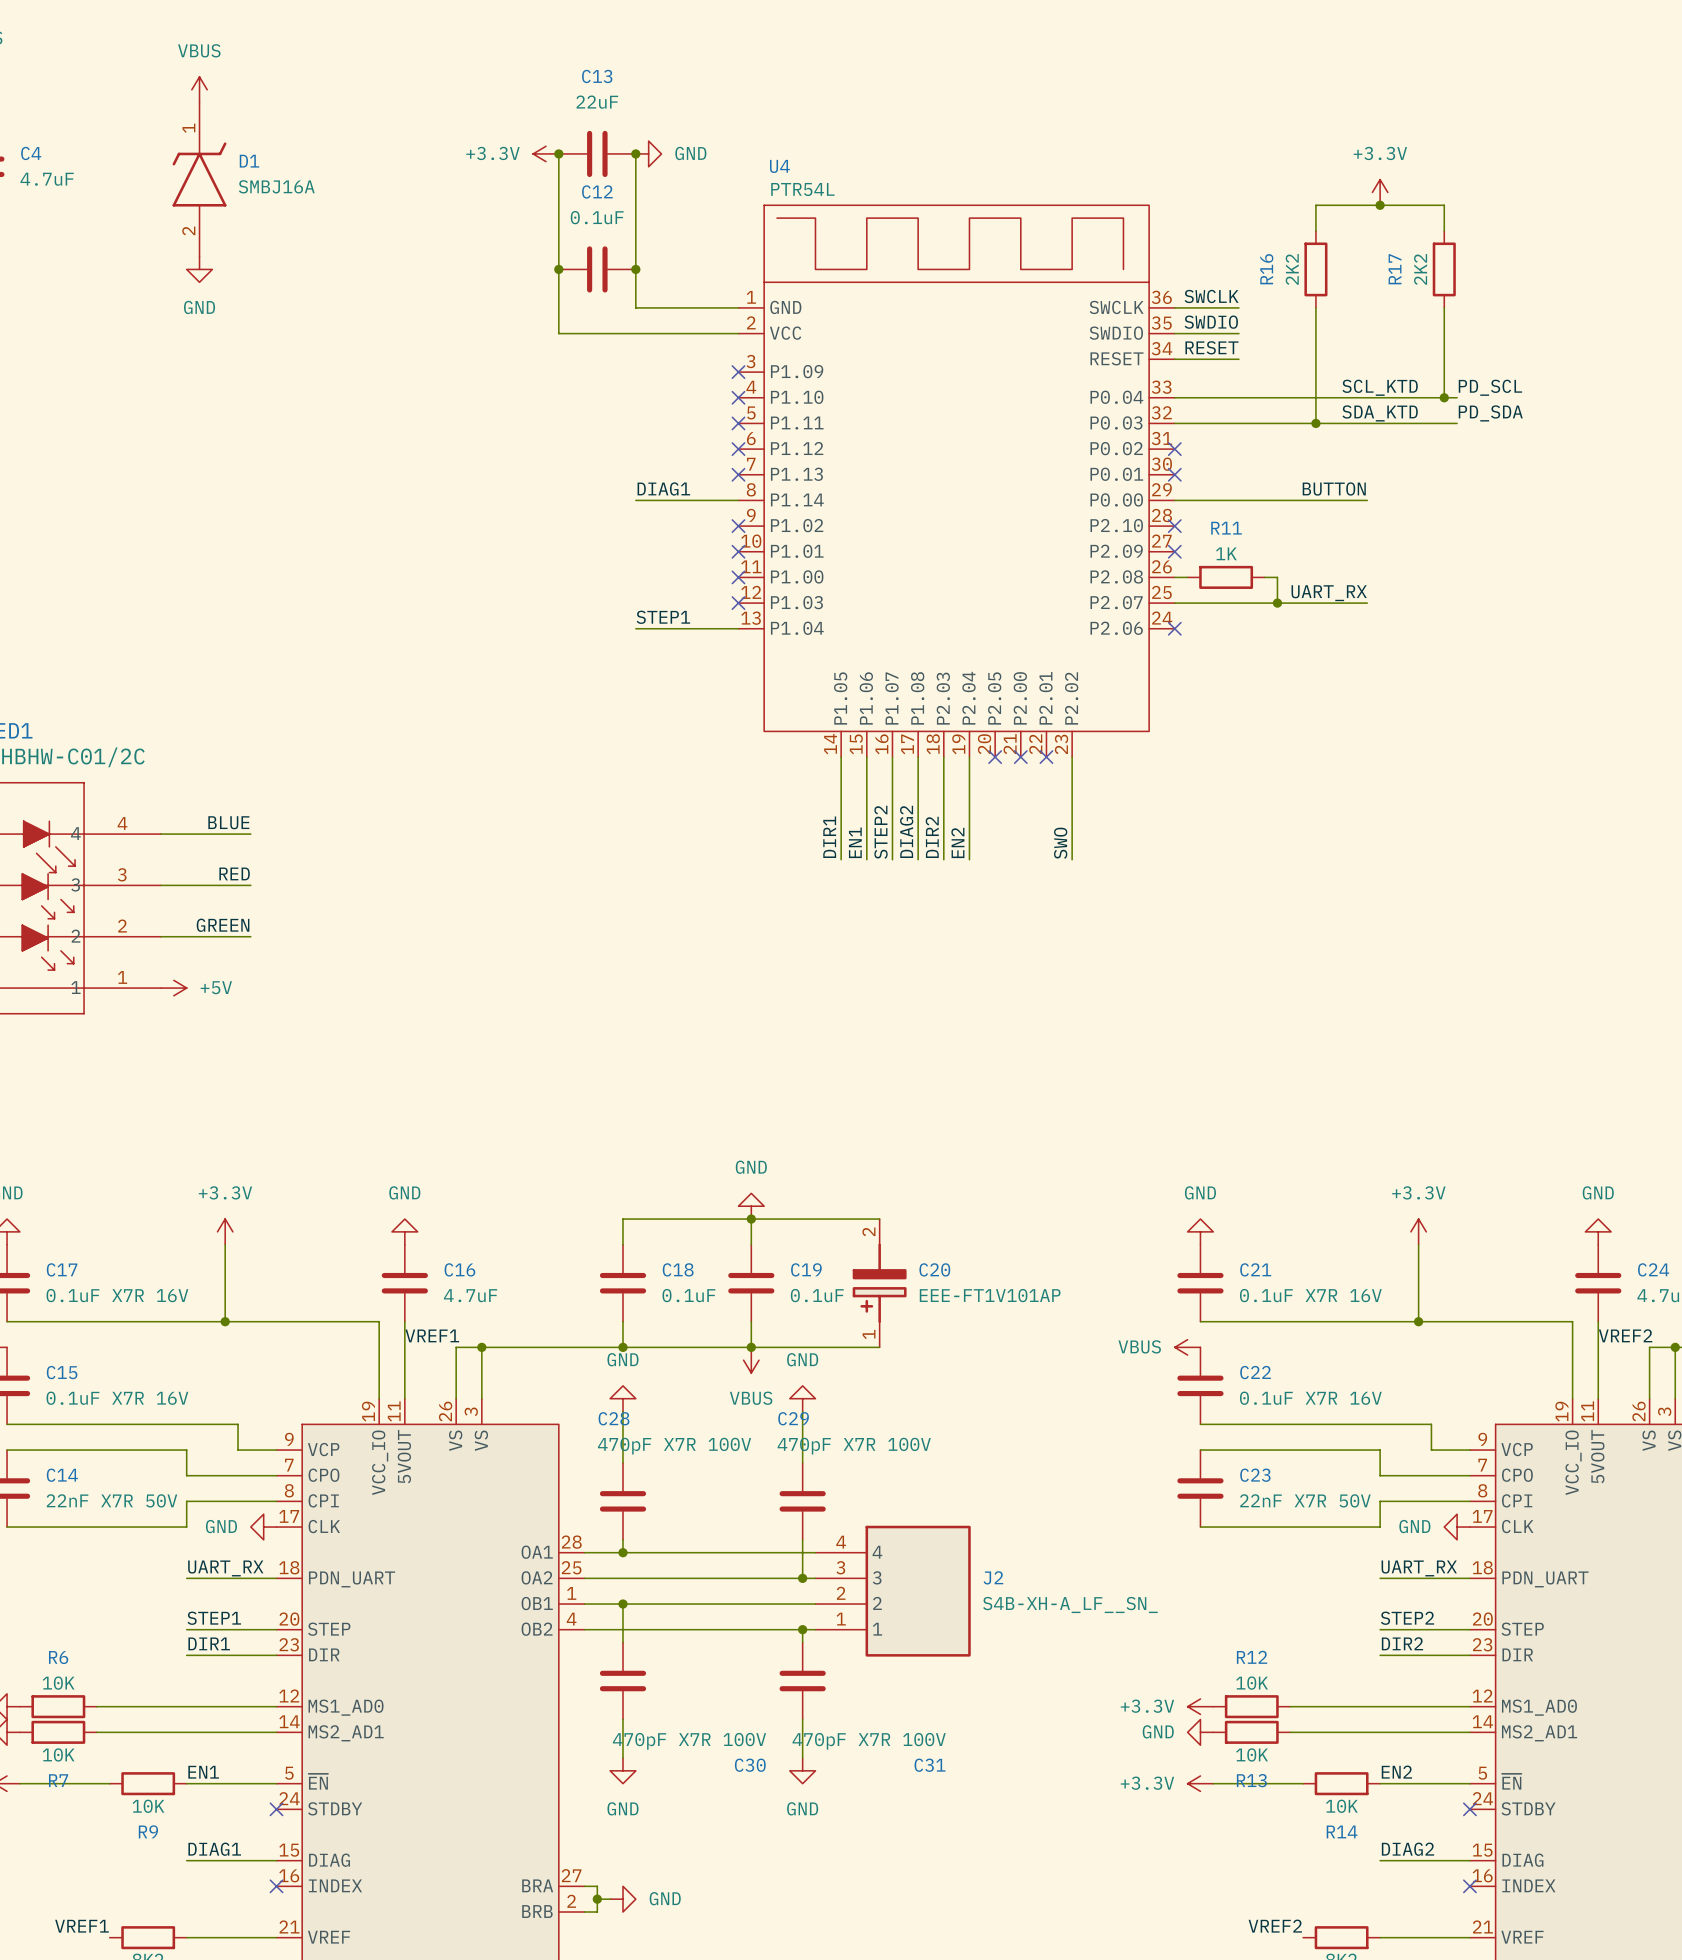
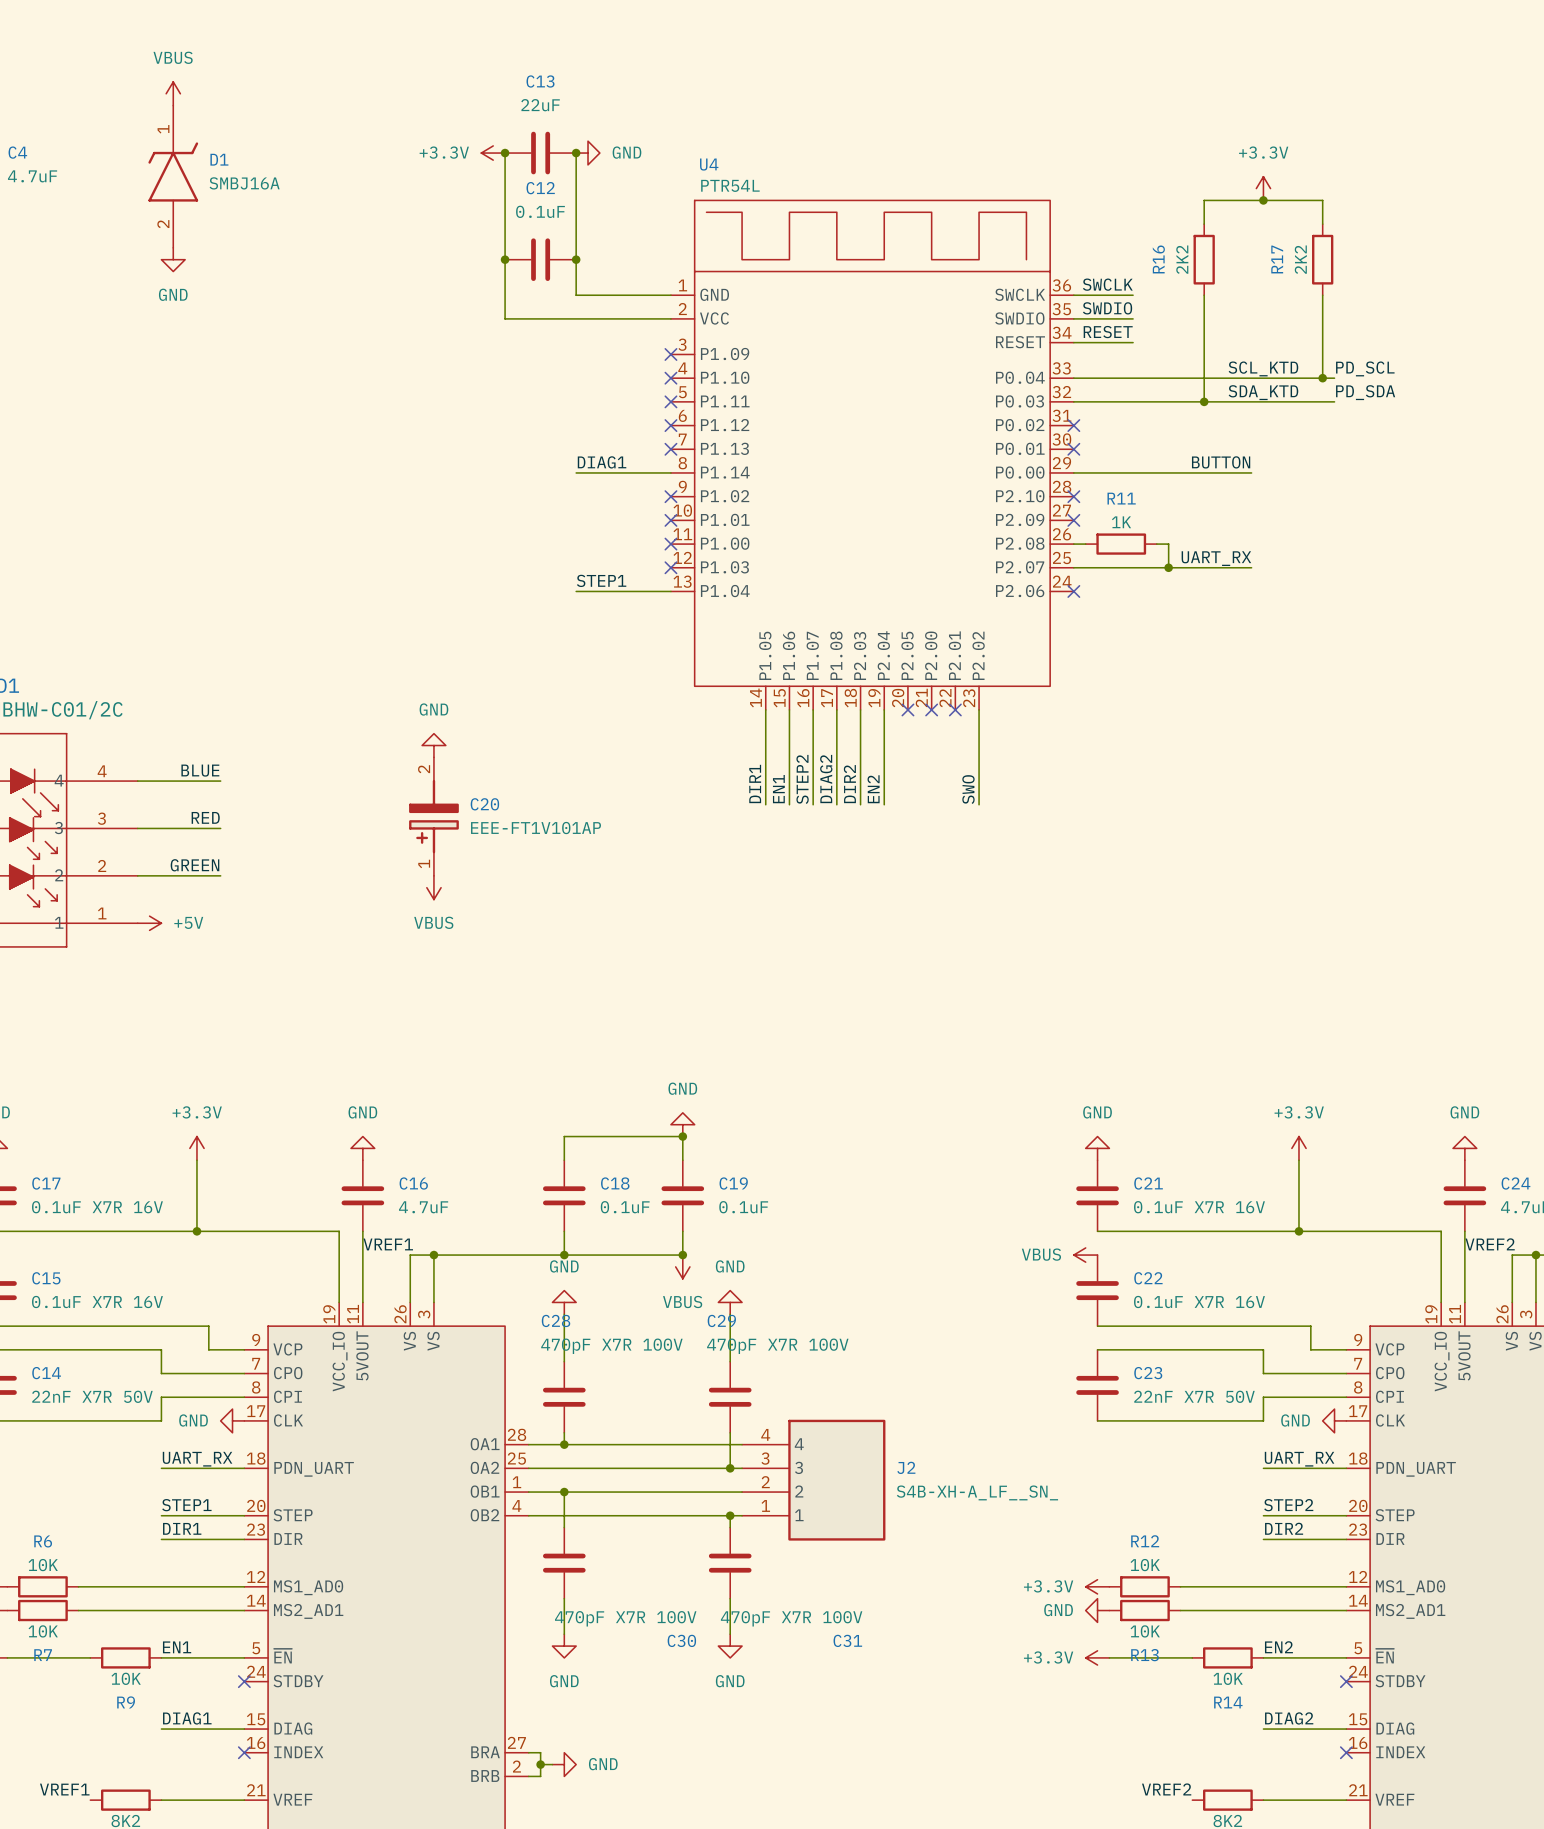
power symbol: none -> GND (433, 745)
power symbol: none -> VBUS (433, 887)
wire: (751, 1219) (879, 1219) -> none
C20 position: (879, 1283) -> (433, 816)
wire: (751, 1347) (879, 1347) -> none

